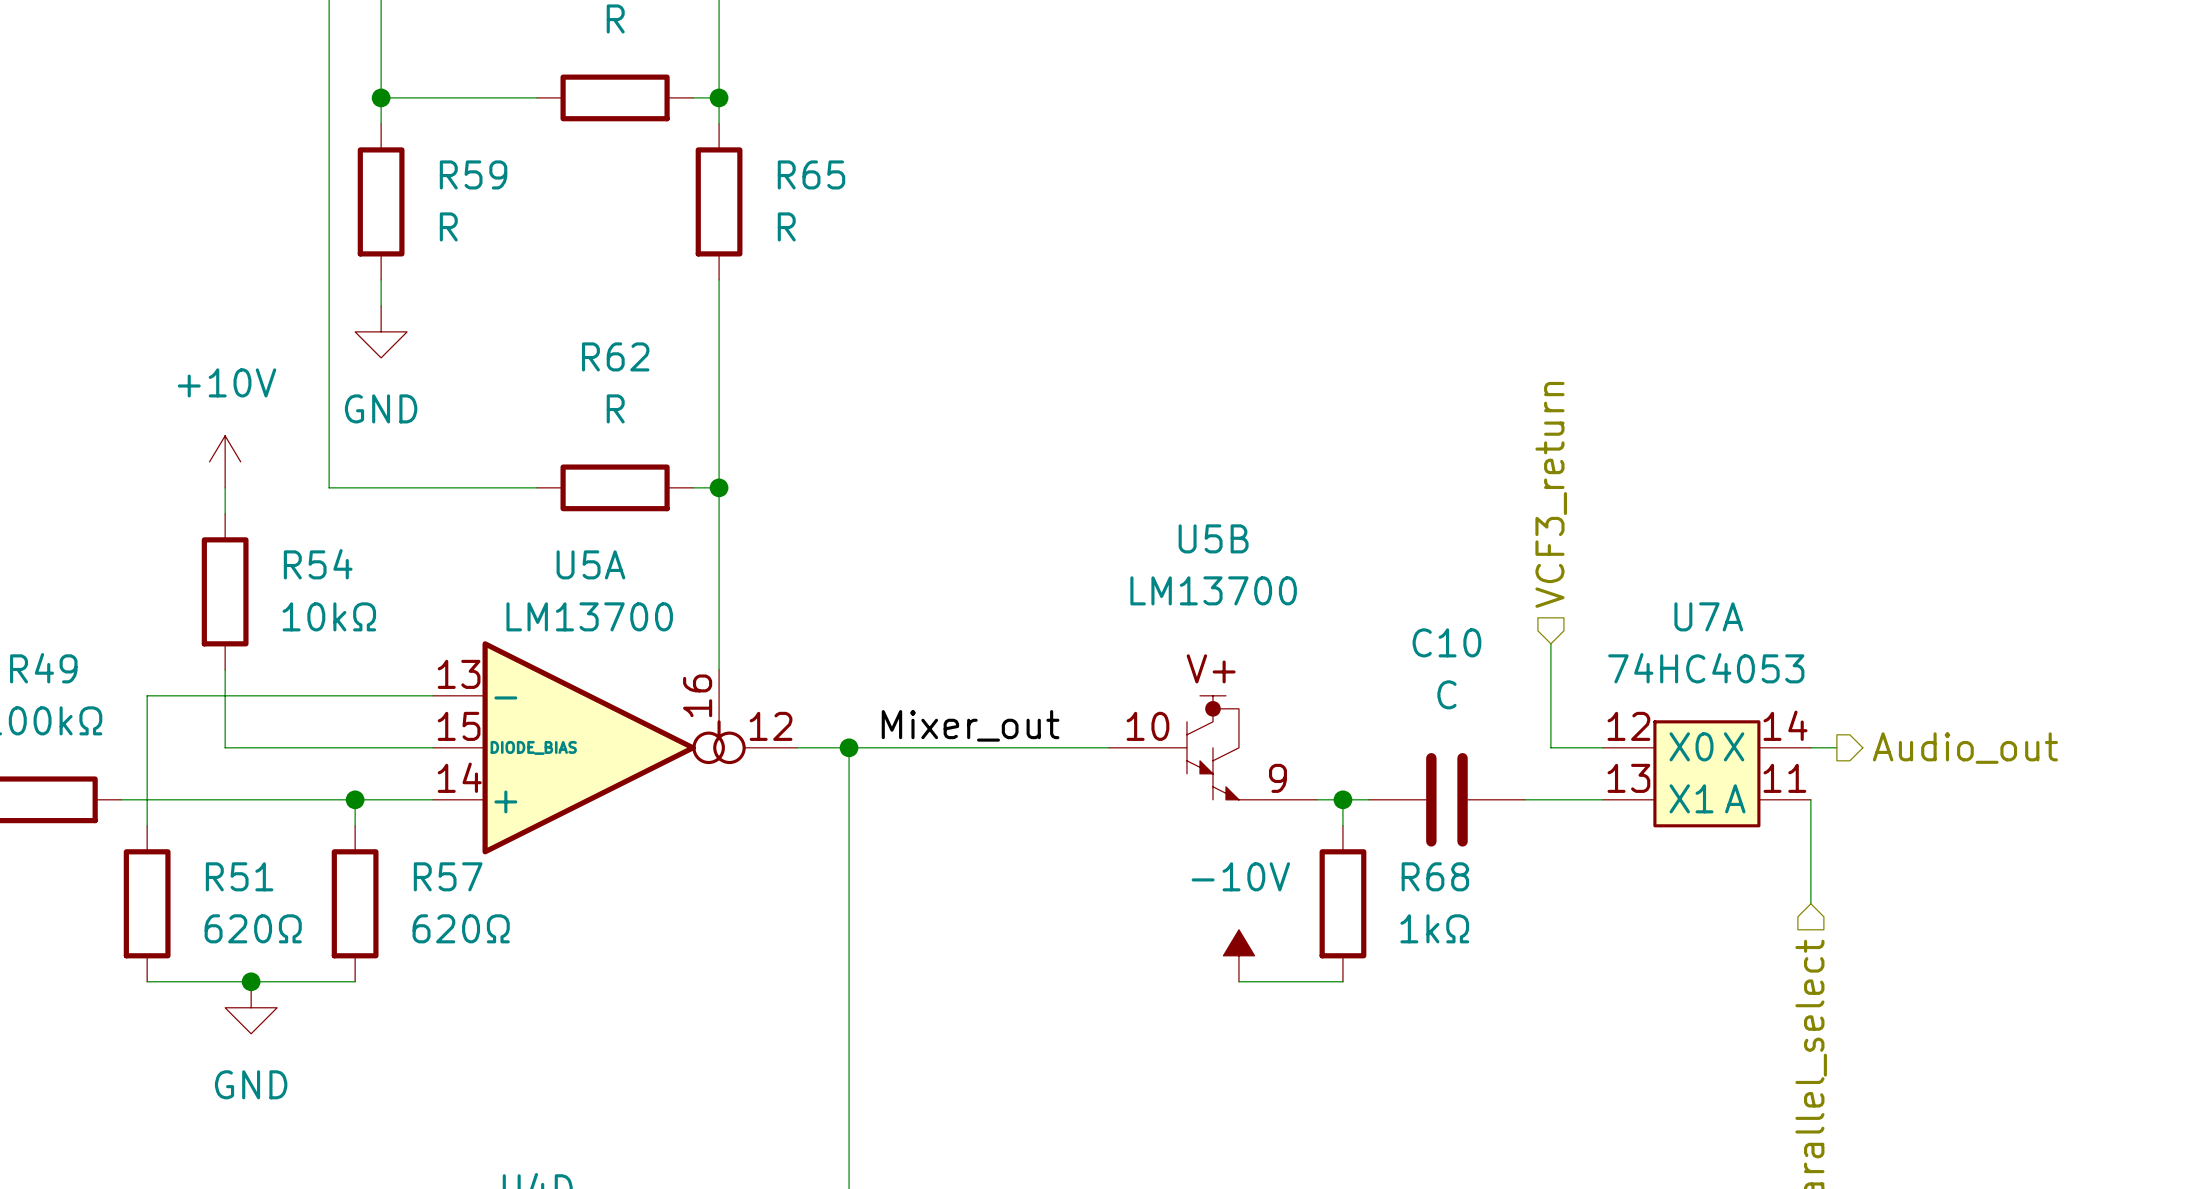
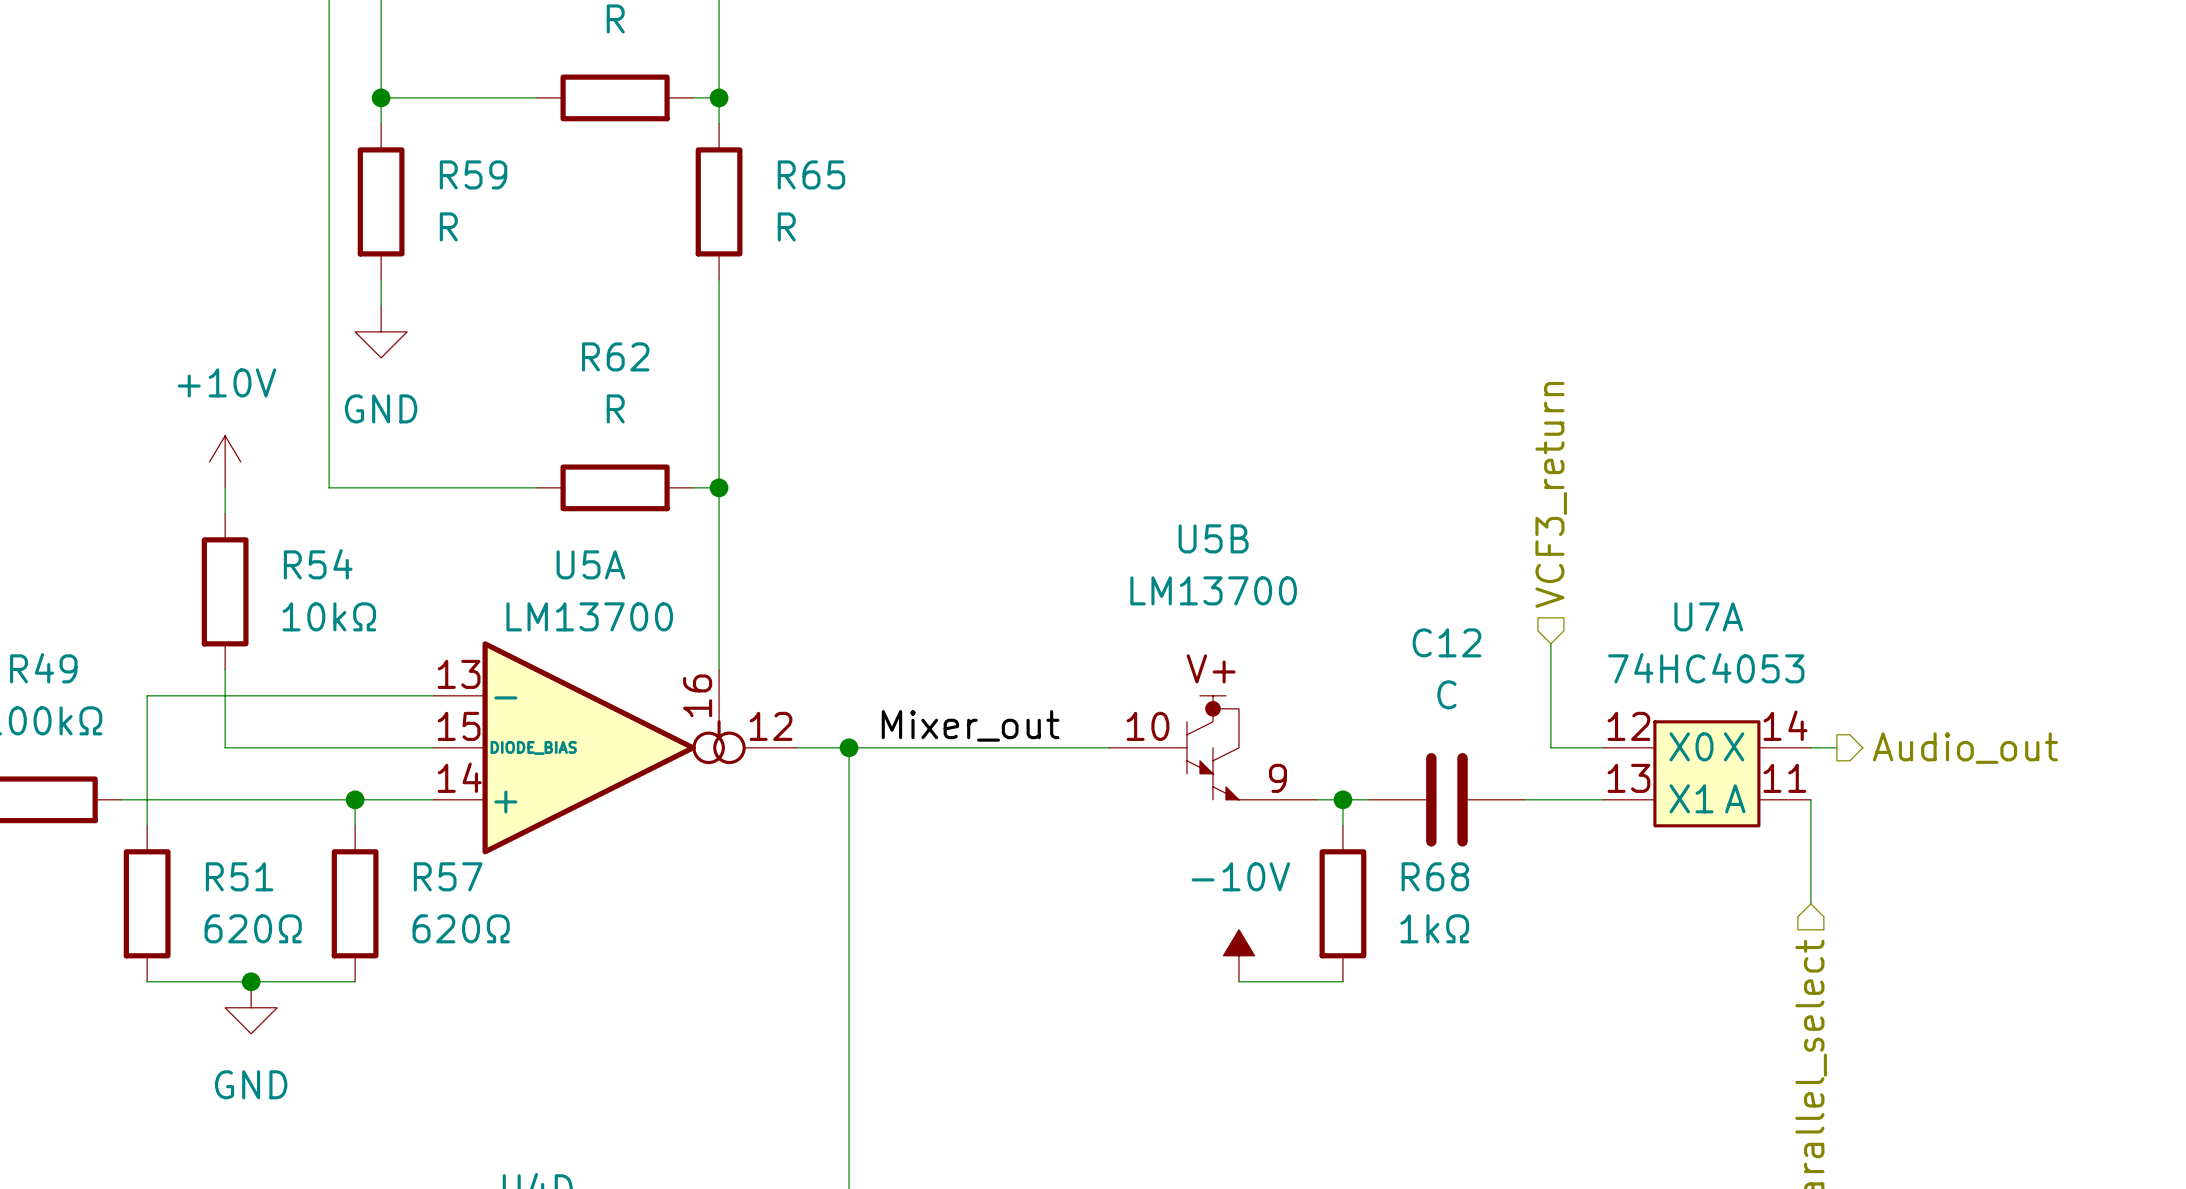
C10 name: C10 (1446, 642) -> C12 (1446, 642)

